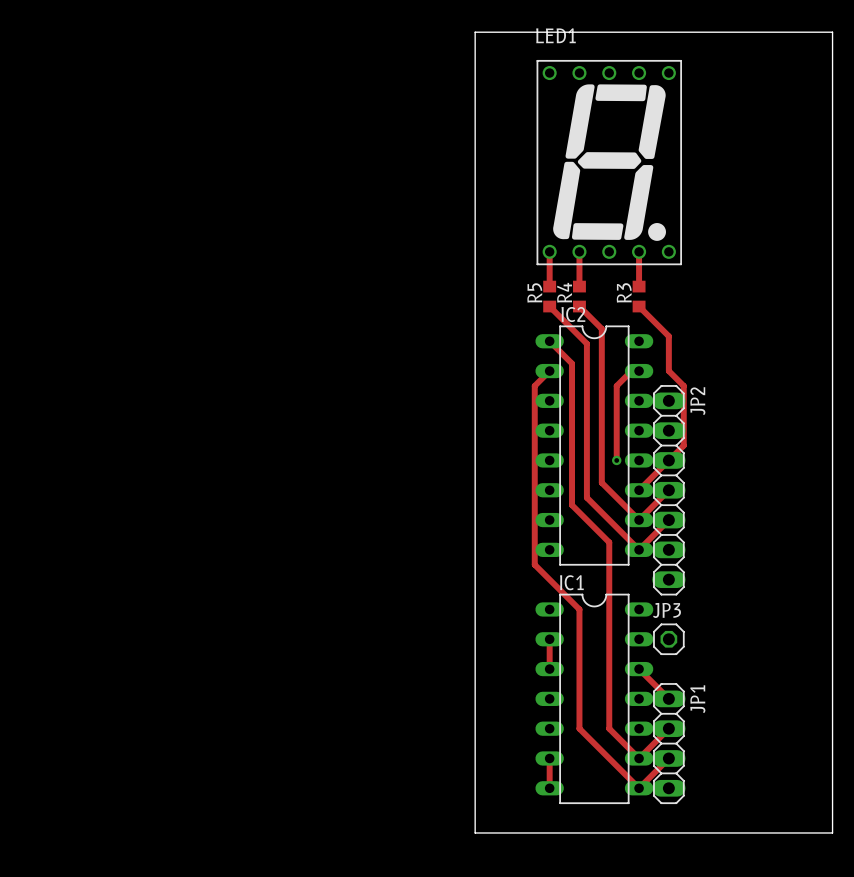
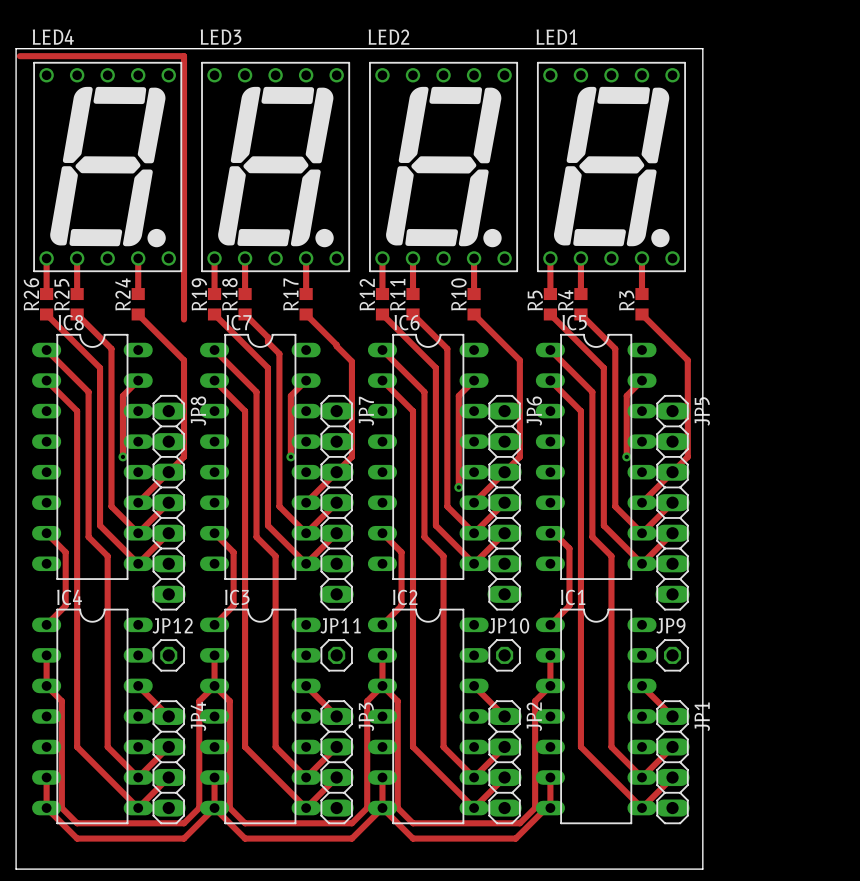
board edge: (475, 32) (832, 32) (832, 832) (475, 832) (475, 32) -> none
board edge: none -> (16, 48) (702, 48) (702, 869) (16, 869) (16, 48)
track: none -> (19, 56) (184, 56) (184, 319)
LED4: none -> (107, 167)
LED3: none -> (275, 167)
LED2: none -> (443, 167)
track: none -> (46, 258) (46, 294)
track: none -> (77, 258) (77, 294)
track: none -> (138, 258) (138, 294)
track: none -> (214, 258) (214, 294)
track: none -> (245, 258) (245, 294)
track: none -> (306, 258) (306, 294)
track: none -> (382, 258) (382, 294)
track: none -> (413, 258) (413, 294)
track: none -> (474, 258) (474, 294)
R26: none -> (46, 304)
R25: none -> (77, 304)
R24: none -> (138, 304)
R19: none -> (214, 304)
R18: none -> (245, 304)
R17: none -> (306, 304)
R12: none -> (382, 304)
R11: none -> (413, 304)
R10: none -> (474, 304)
track: none -> (46, 314) (100, 367) (100, 525) (138, 563) (168, 533)
track: none -> (77, 314) (111, 348) (111, 506) (138, 533) (168, 502)
track: none -> (138, 314) (184, 360) (184, 456) (138, 502)
track: none -> (214, 314) (267, 367) (267, 525) (306, 563) (336, 533)
track: none -> (245, 314) (267, 337) (267, 342) (279, 353) (279, 506) (306, 533) (336, 502)
track: none -> (306, 314) (351, 361) (351, 456) (306, 502)
track: none -> (382, 314) (435, 367) (435, 525) (474, 563) (504, 533)
track: none -> (413, 314) (447, 348) (447, 506) (474, 533) (504, 502)
track: none -> (474, 314) (519, 360) (519, 456) (474, 502)
IC2 name: IC2 (573, 314) -> IC5 (574, 322)
track: (601, 328) (601, 358) -> (588, 352) (603, 367)
track: none -> (603, 337) (615, 348) (615, 506)
track: (668, 336) (668, 371) (683, 385) -> (672, 345) (687, 360) (687, 395)
track: none -> (46, 350) (88, 392) (88, 537) (107, 556) (107, 746) (138, 777) (168, 746)
track: none -> (214, 350) (256, 392) (256, 537) (275, 556) (275, 746) (306, 777) (336, 746)
track: none -> (382, 350) (424, 392) (424, 537) (443, 556) (443, 746) (474, 777) (504, 746)
track: (586, 343) (586, 497) (601, 512) -> none
track: (572, 363) (572, 505) (590, 523) -> (573, 372) (592, 392) (592, 537)
track: none -> (46, 380) (77, 411) (77, 746) (138, 808) (168, 777)
track: none -> (138, 380) (122, 395) (122, 456)
track: none -> (214, 380) (245, 411) (245, 746) (306, 808) (336, 777)
track: none -> (306, 380) (290, 395) (290, 456)
track: none -> (382, 380) (413, 411) (413, 746) (474, 808) (504, 777)
track: none -> (474, 380) (458, 395) (458, 487)
track: (549, 371) (534, 385) (534, 564) (579, 609) -> (550, 380) (580, 411) (580, 624)
track: (639, 371) (631, 371) (616, 385) (616, 460) -> (642, 380) (626, 395) (626, 456)
JP2 name: JP2 (697, 401) -> JP5 (702, 411)
IC8: none -> (92, 456)
via: none -> (122, 456)
IC7: none -> (260, 456)
via: none -> (290, 456)
IC6: none -> (428, 456)
via: none -> (626, 456)
via: (616, 460) -> none
via: none -> (458, 487)
track: (601, 482) (612, 493) -> (603, 495) (603, 525)
JP8: none -> (168, 502)
JP7: none -> (336, 502)
JP6: none -> (504, 502)
track: none -> (46, 533) (65, 552) (65, 605) (46, 624)
track: none -> (214, 533) (233, 552) (233, 605) (214, 624)
track: none -> (382, 533) (401, 552) (401, 605) (382, 624)
track: none -> (550, 533) (554, 533) (569, 548) (569, 605) (550, 624)
JP3 name: JP3 (667, 610) -> JP9 (670, 625)
track: none -> (46, 655) (46, 685) (61, 701) (61, 808) (77, 823) (184, 823) (199, 808) (199, 701) (214, 685)
JP12: none -> (168, 655)
track: none -> (214, 655) (214, 685)
JP11: none -> (336, 655)
track: none -> (382, 655) (382, 685)
JP10: none -> (504, 655)
track: none -> (138, 685) (168, 716)
track: none -> (214, 685) (229, 701) (229, 808) (245, 823) (351, 823) (367, 808) (367, 701) (382, 685)
track: none -> (306, 685) (336, 716)
track: none -> (382, 685) (397, 701) (397, 808) (413, 823) (519, 823) (535, 808) (535, 701) (550, 685)
track: none -> (474, 685) (504, 716)
IC4: none -> (92, 716)
IC3: none -> (260, 716)
IC2: none -> (428, 716)
JP4: none -> (168, 762)
JP3: none -> (336, 762)
JP2: none -> (504, 762)
track: none -> (46, 777) (46, 808) (77, 838) (184, 838) (214, 808)
track: none -> (214, 777) (214, 808)
track: none -> (382, 777) (382, 808)
track: none -> (214, 808) (245, 838) (351, 838) (382, 808)
track: none -> (382, 808) (413, 838) (515, 838) (546, 808) (550, 808)

